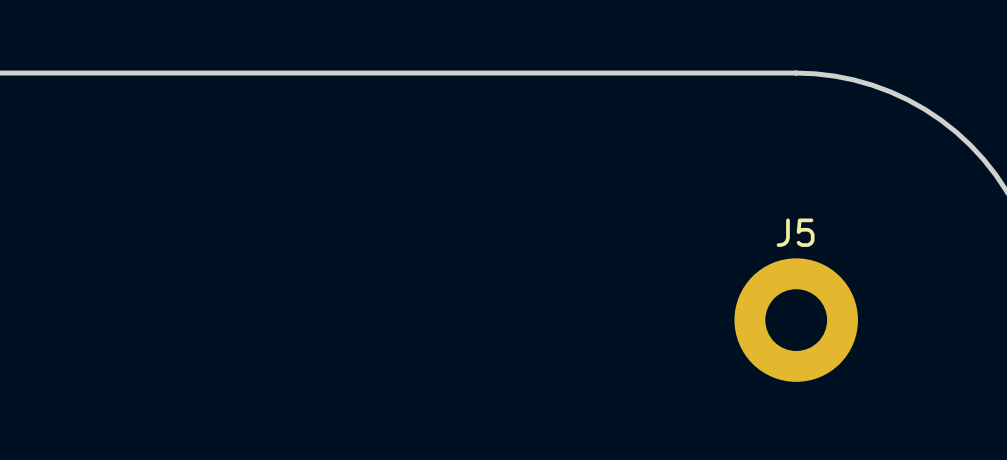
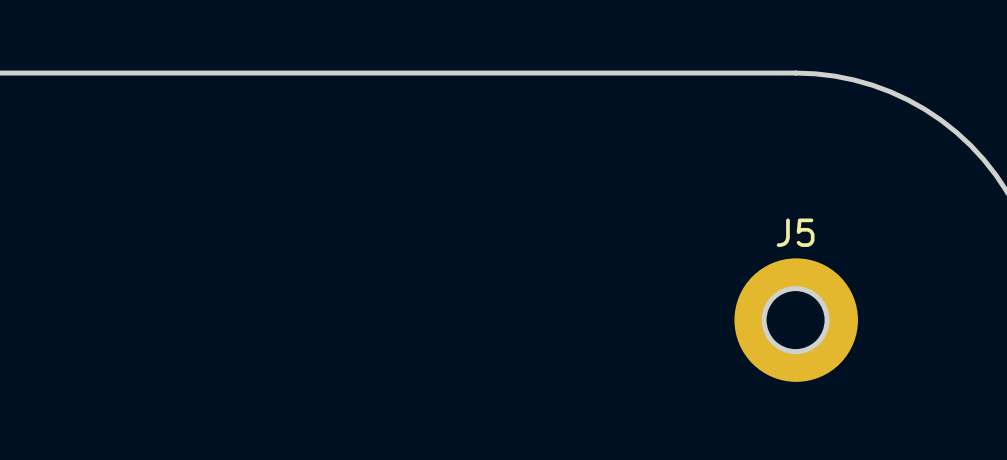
round board edge: none -> [761, 286, 830, 355]

